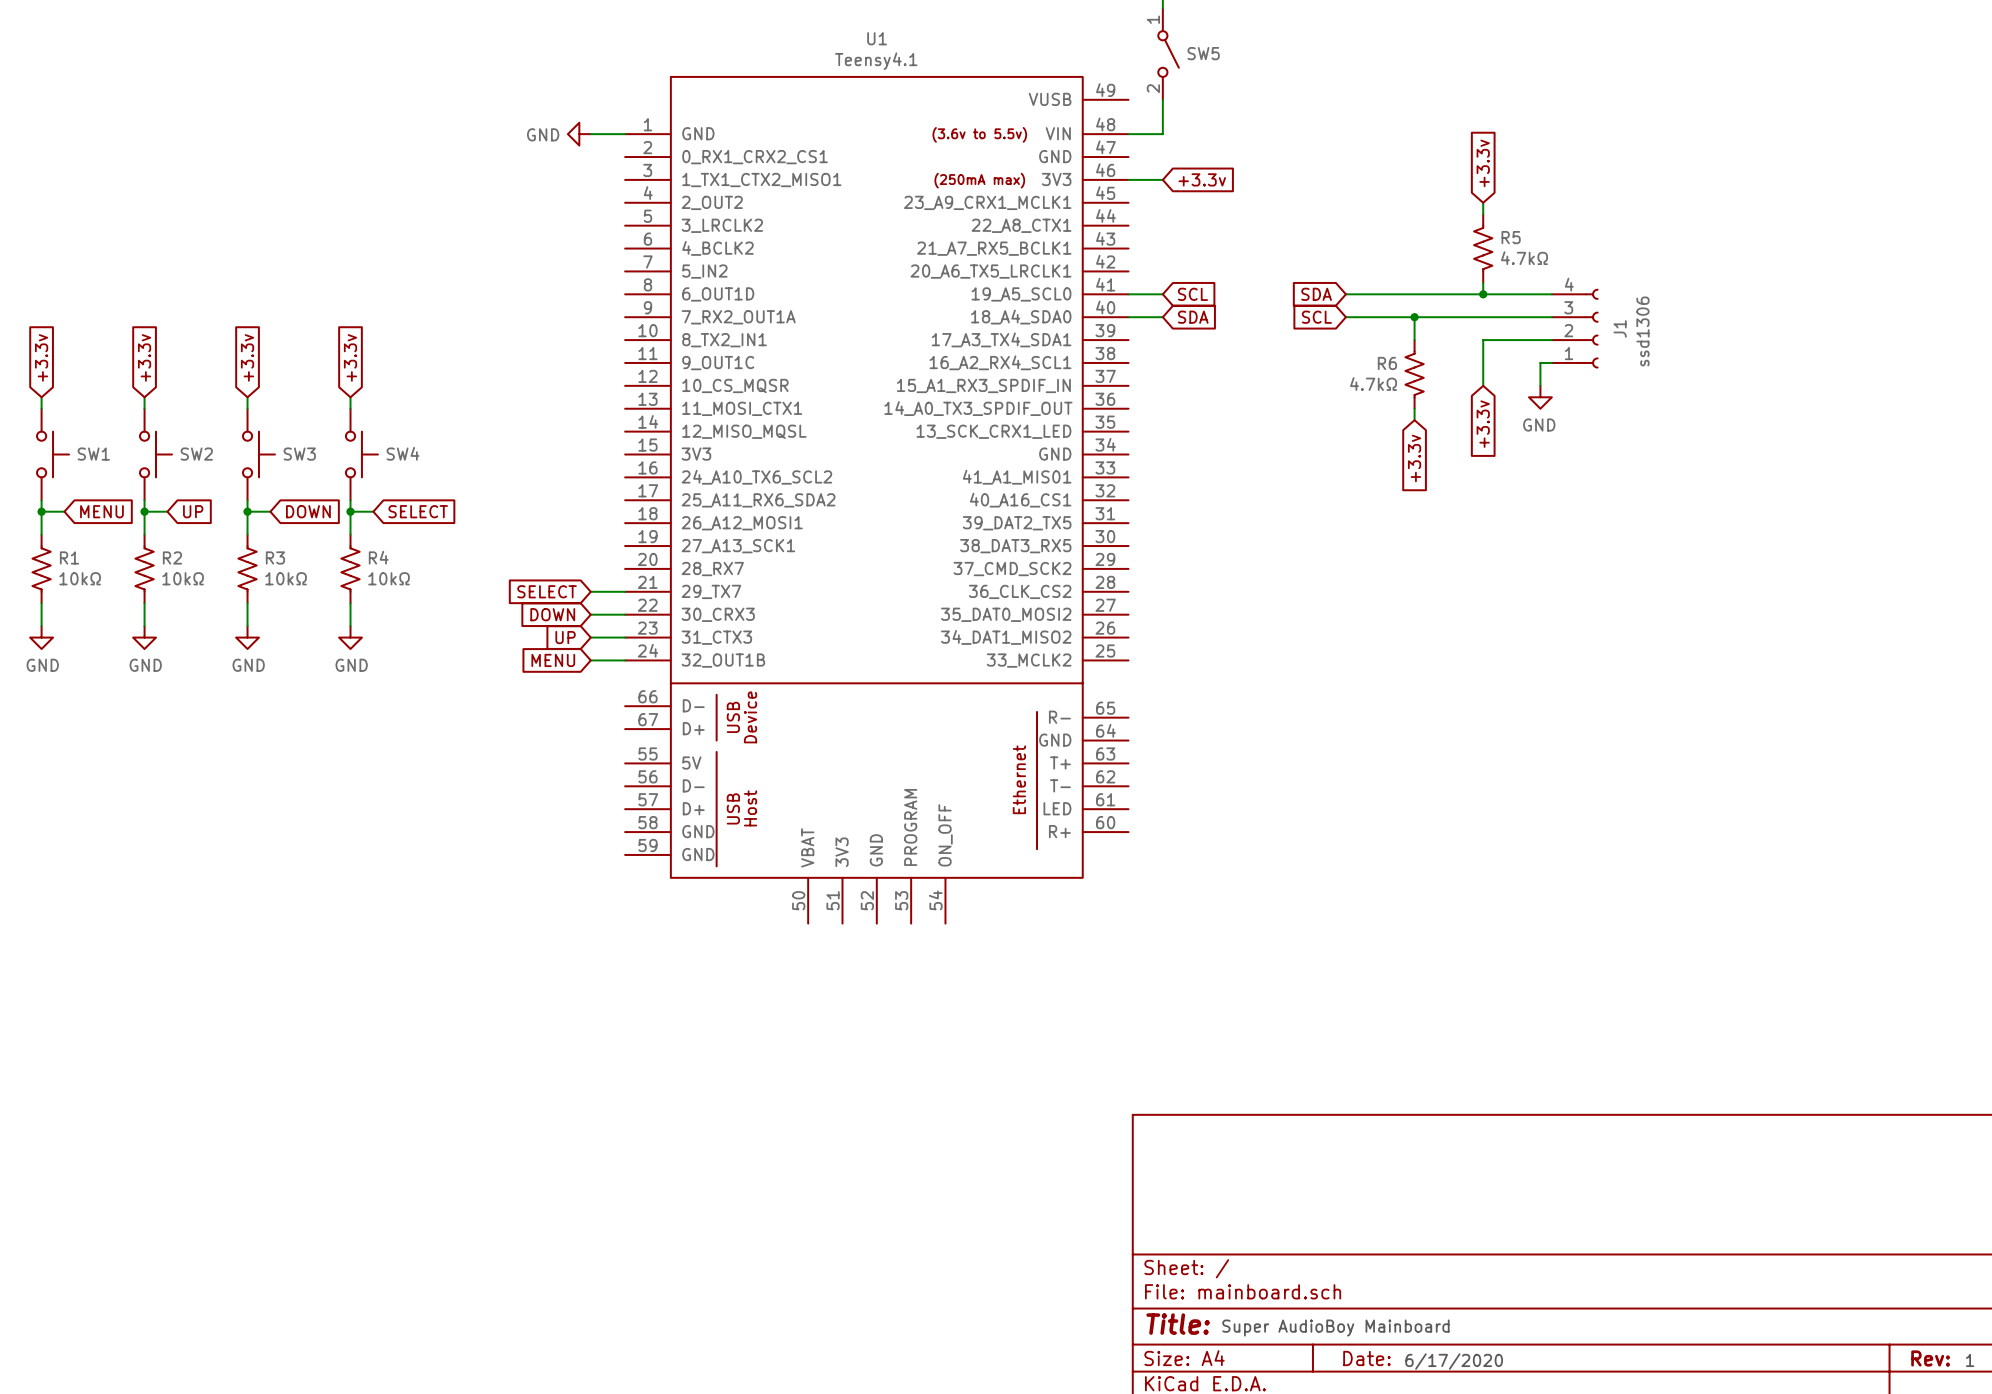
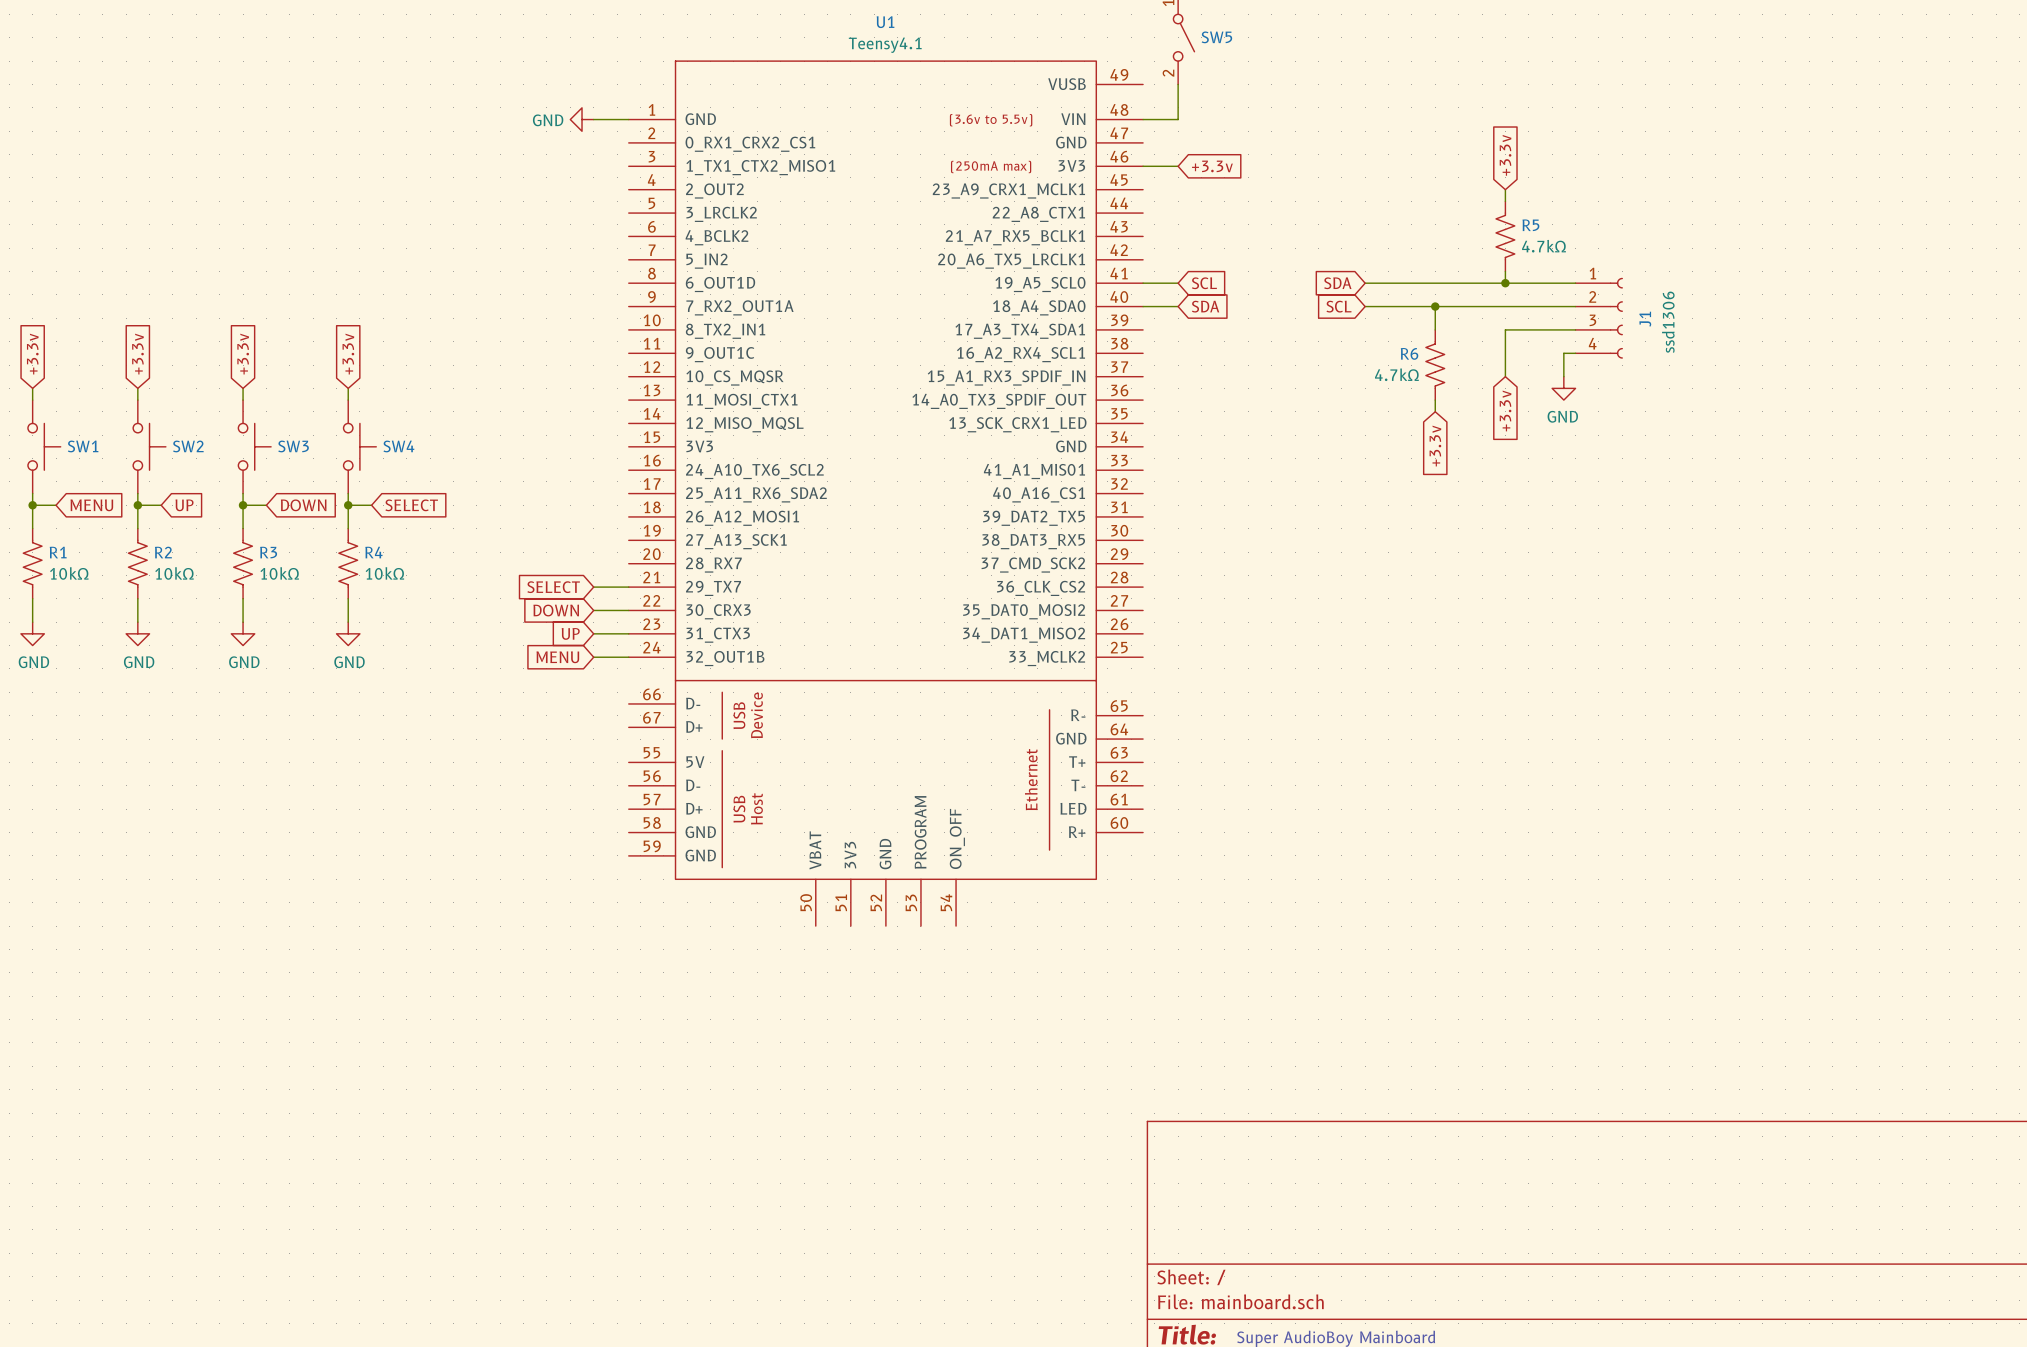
J1 flip: as is (1591, 328) -> up-down (1616, 318)

